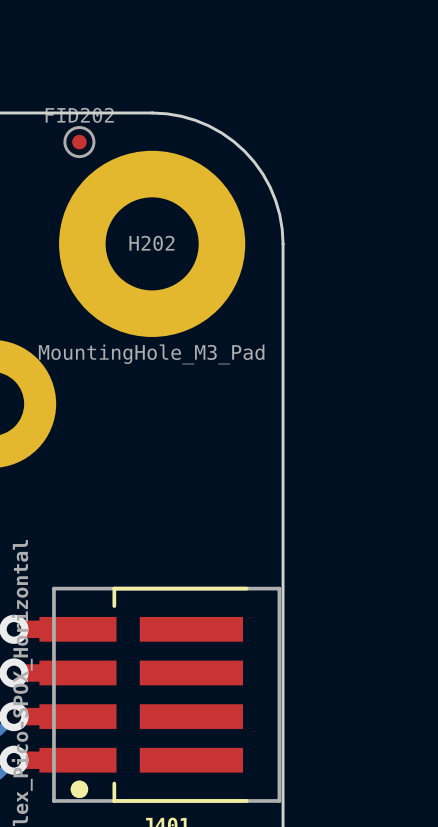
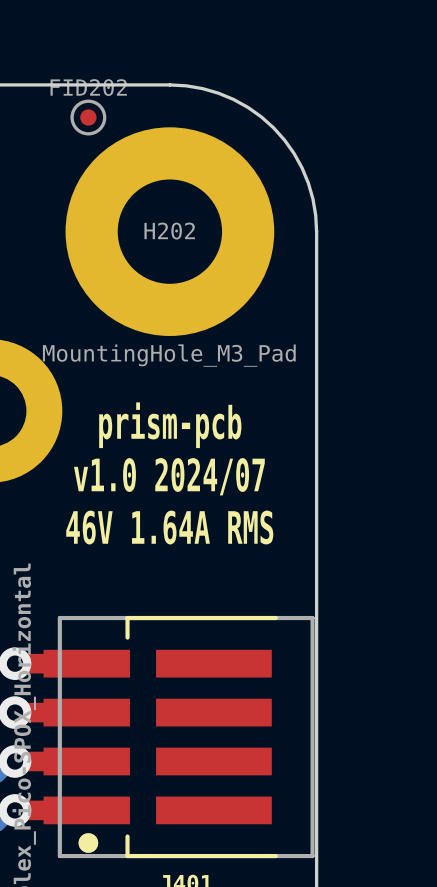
text: none -> prism-pcb (170, 425)
text: none -> v1.0 2024/07 (169, 476)
text: none -> 46V 1.64A RMS (169, 527)

